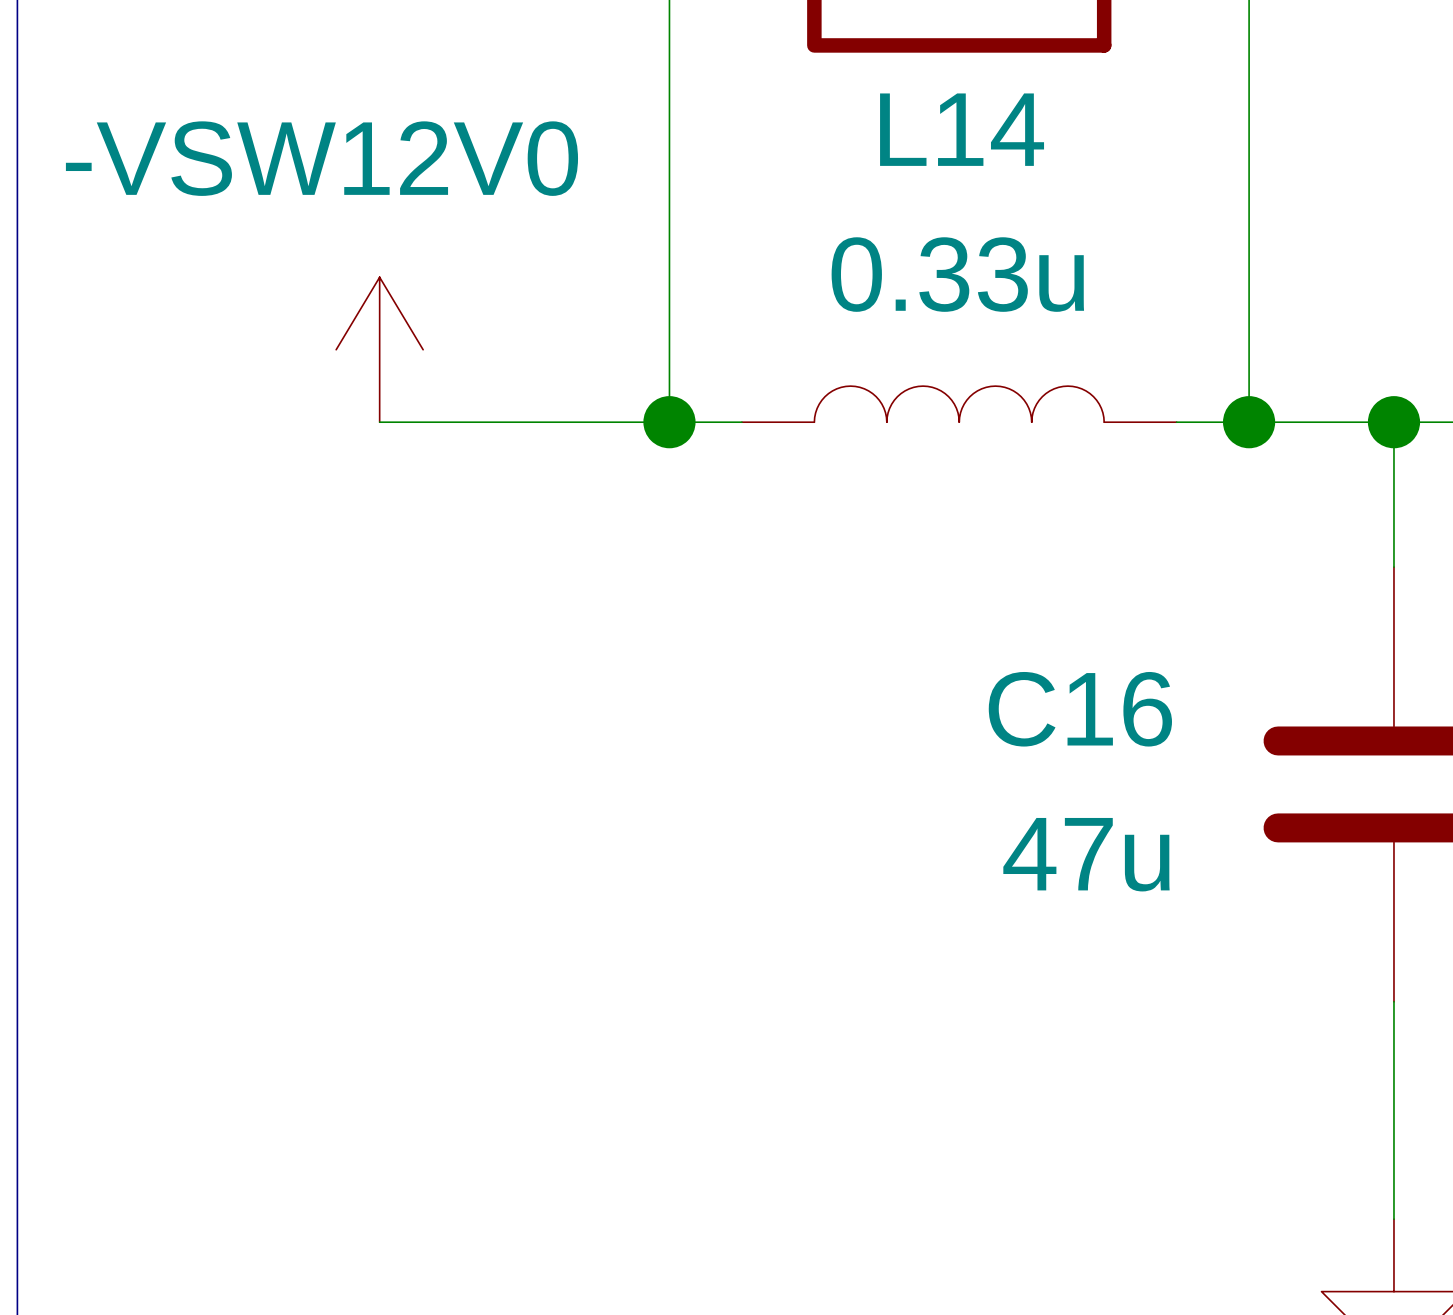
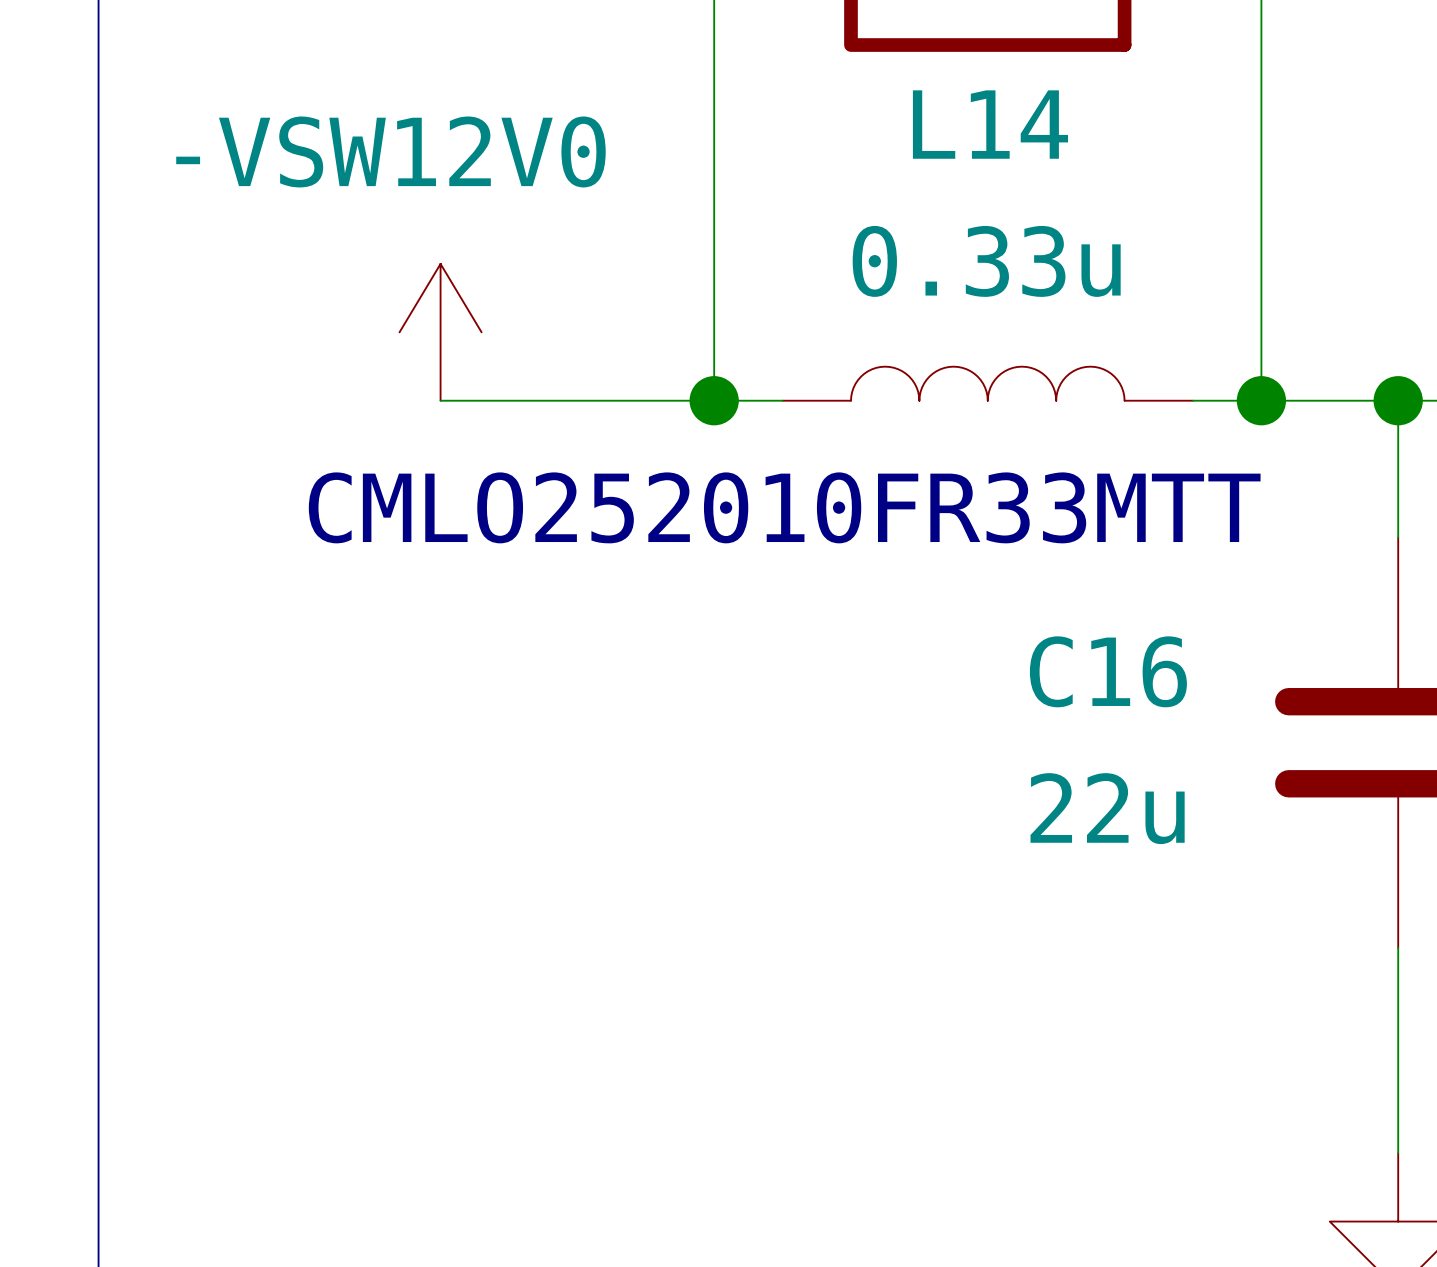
text: none -> CMLO252010FR33MTT (784, 507)
C16 value: 47u (1086, 854) -> 22u (1107, 808)

